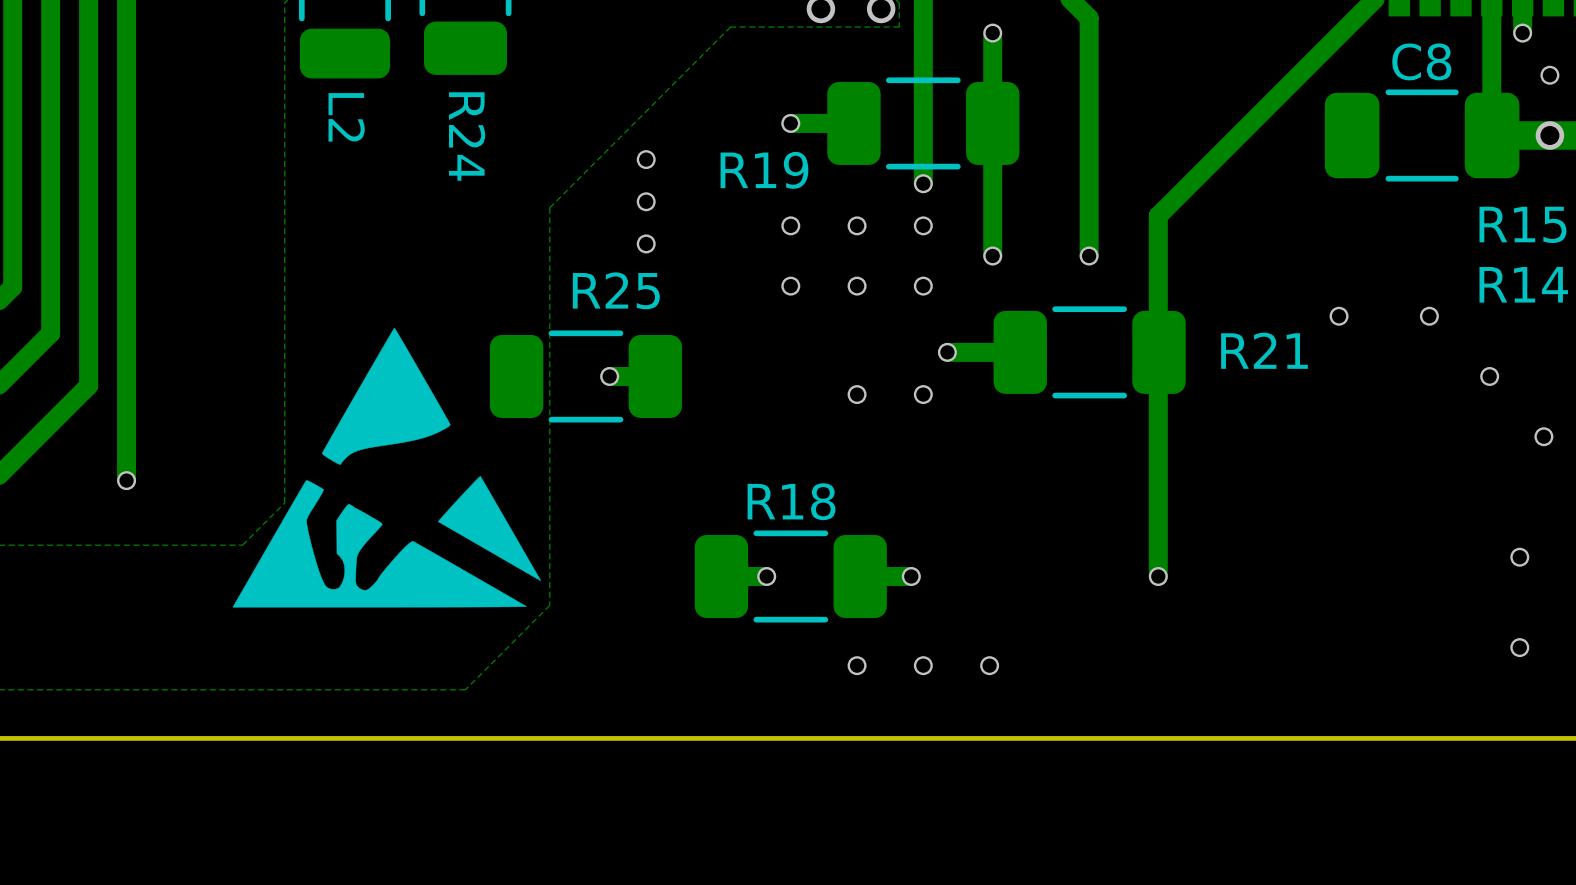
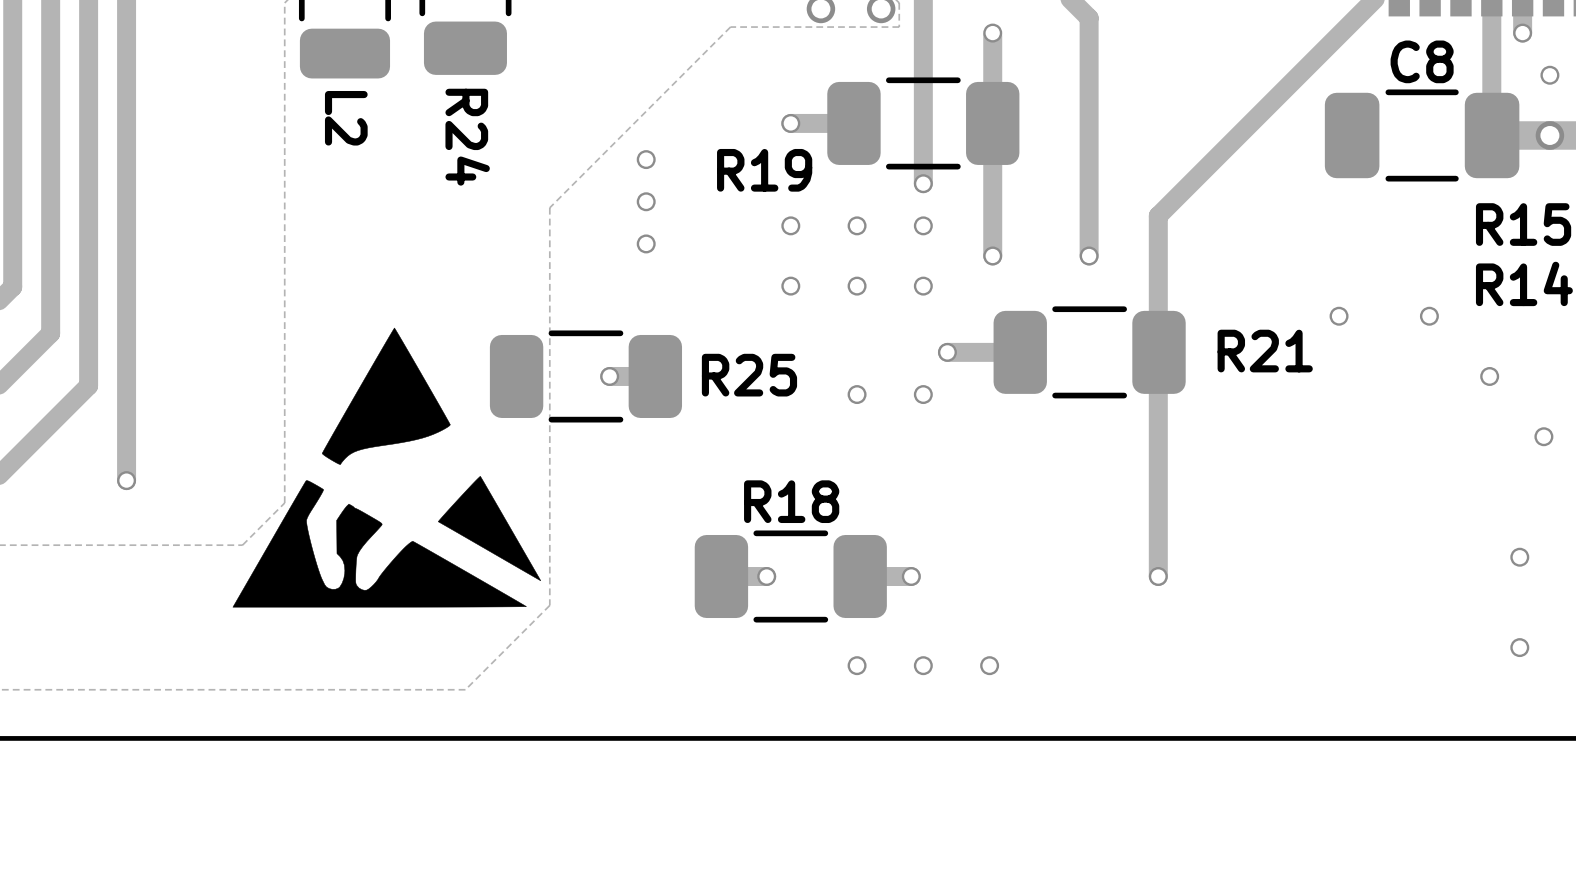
R25 name position: R25 (616, 290) -> R25 (749, 375)

